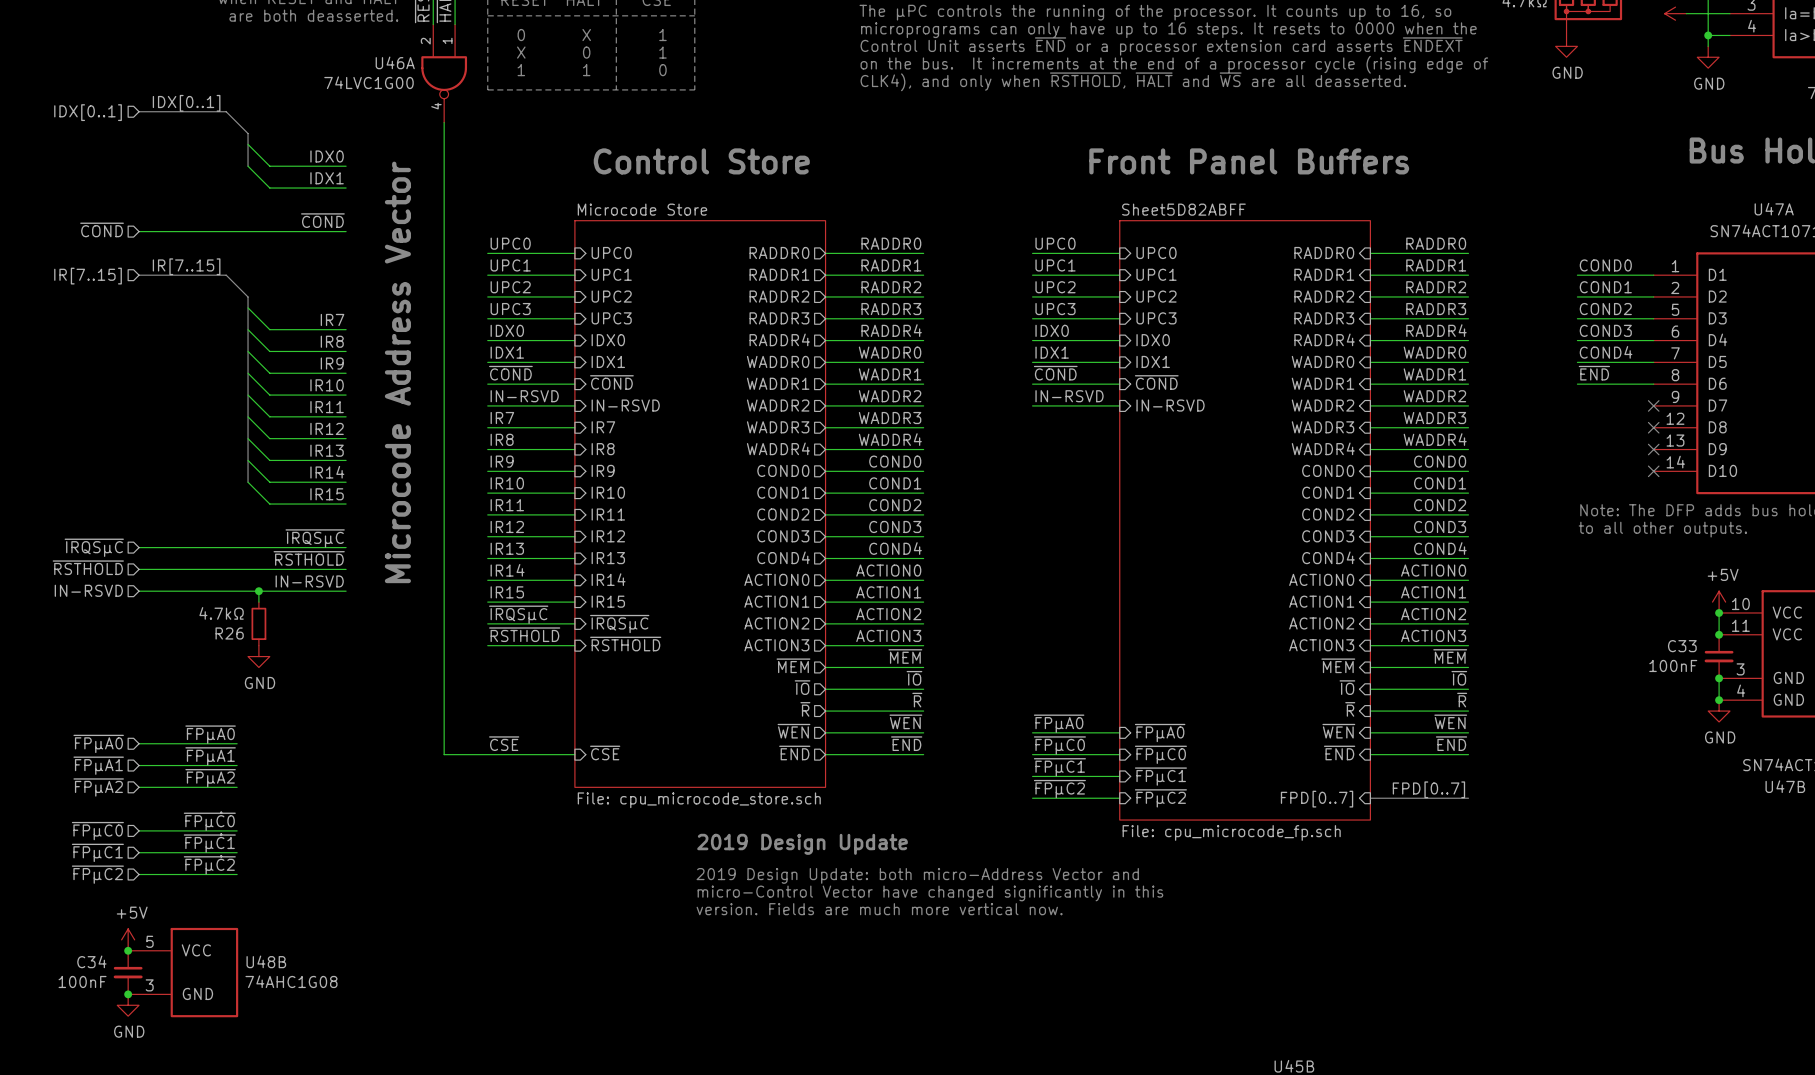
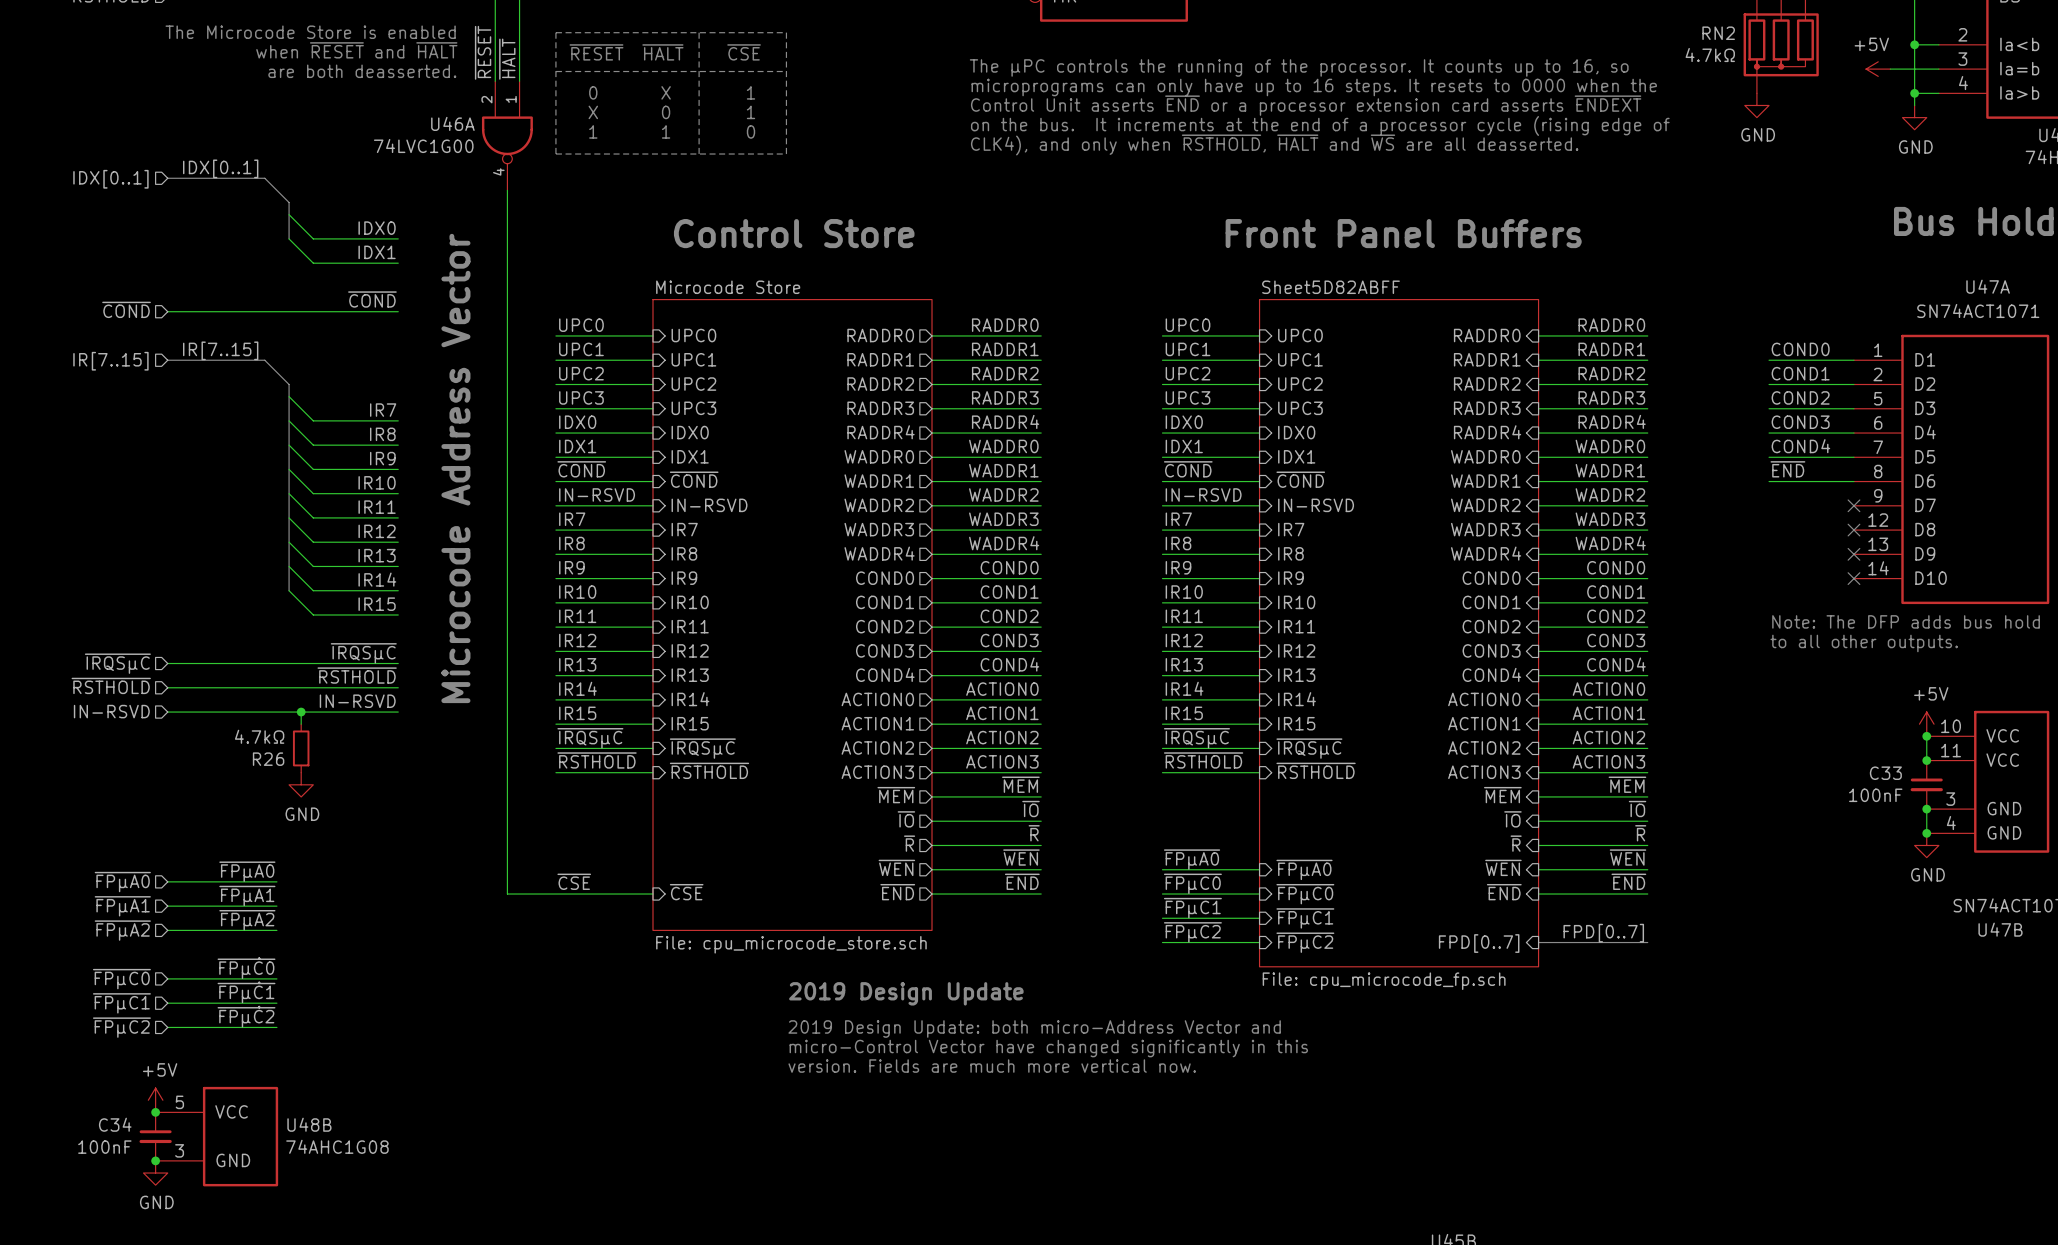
label: none -> IR7 (1178, 519)
wire: none -> (1162, 530) (1259, 530)
sheet pin: none -> IR7 (1291, 529)
label: none -> IR8 (1178, 543)
wire: none -> (1162, 554) (1259, 554)
sheet pin: none -> IR8 (1290, 553)
label: none -> IR9 (1178, 567)
sheet pin: none -> IR9 (1290, 578)
wire: none -> (1162, 578) (1259, 578)
label: none -> IR10 (1184, 592)
sheet pin: none -> IR10 (1296, 602)
wire: none -> (1162, 602) (1259, 602)
label: none -> IR11 (1184, 616)
wire: none -> (1162, 627) (1259, 627)
sheet pin: none -> IR11 (1296, 626)
label: none -> IR12 (1184, 640)
wire: none -> (1162, 651) (1259, 651)
sheet pin: none -> IR12 (1296, 650)
label: none -> IR13 (1184, 664)
wire: none -> (1162, 675) (1259, 675)
sheet pin: none -> IR13 (1296, 675)
label: none -> IR14 (1184, 688)
sheet pin: none -> IR14 (1296, 699)
wire: none -> (1162, 699) (1259, 699)
label: none -> IR15 (1184, 713)
sheet pin: none -> IR15 (1296, 723)
wire: none -> (1162, 724) (1259, 724)
label: none -> ~{IRQSµC} (1196, 738)
wire: none -> (1162, 748) (1259, 748)
sheet pin: none -> ~{IRQSµC} (1309, 748)
label: none -> ~{RSTHOLD} (1203, 760)
sheet pin: none -> ~{RSTHOLD} (1316, 770)
wire: none -> (1162, 772) (1259, 772)

